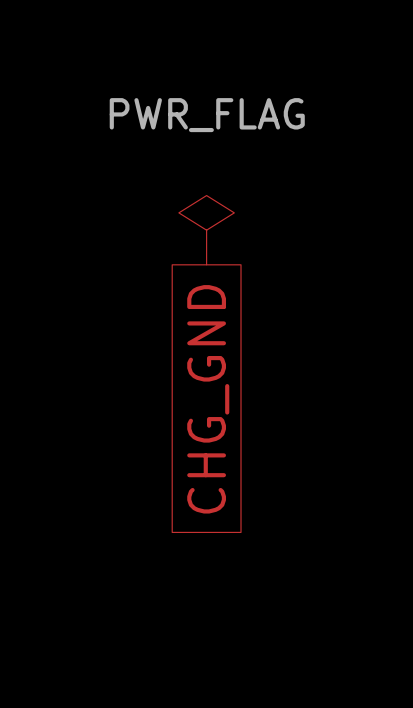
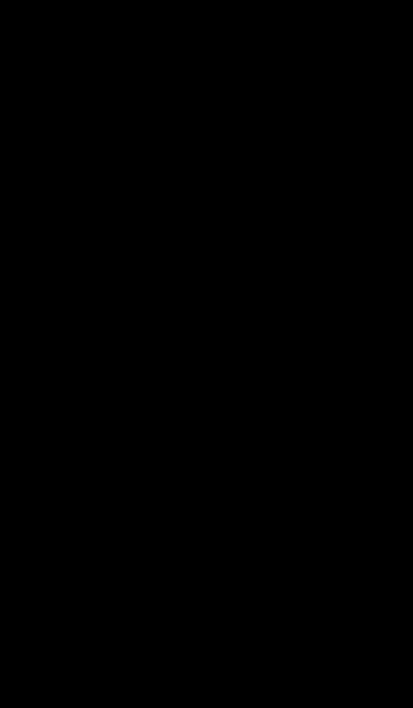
power symbol: PWR_FLAG (206, 230) -> none
global label: CHG_GND (208, 399) -> none

